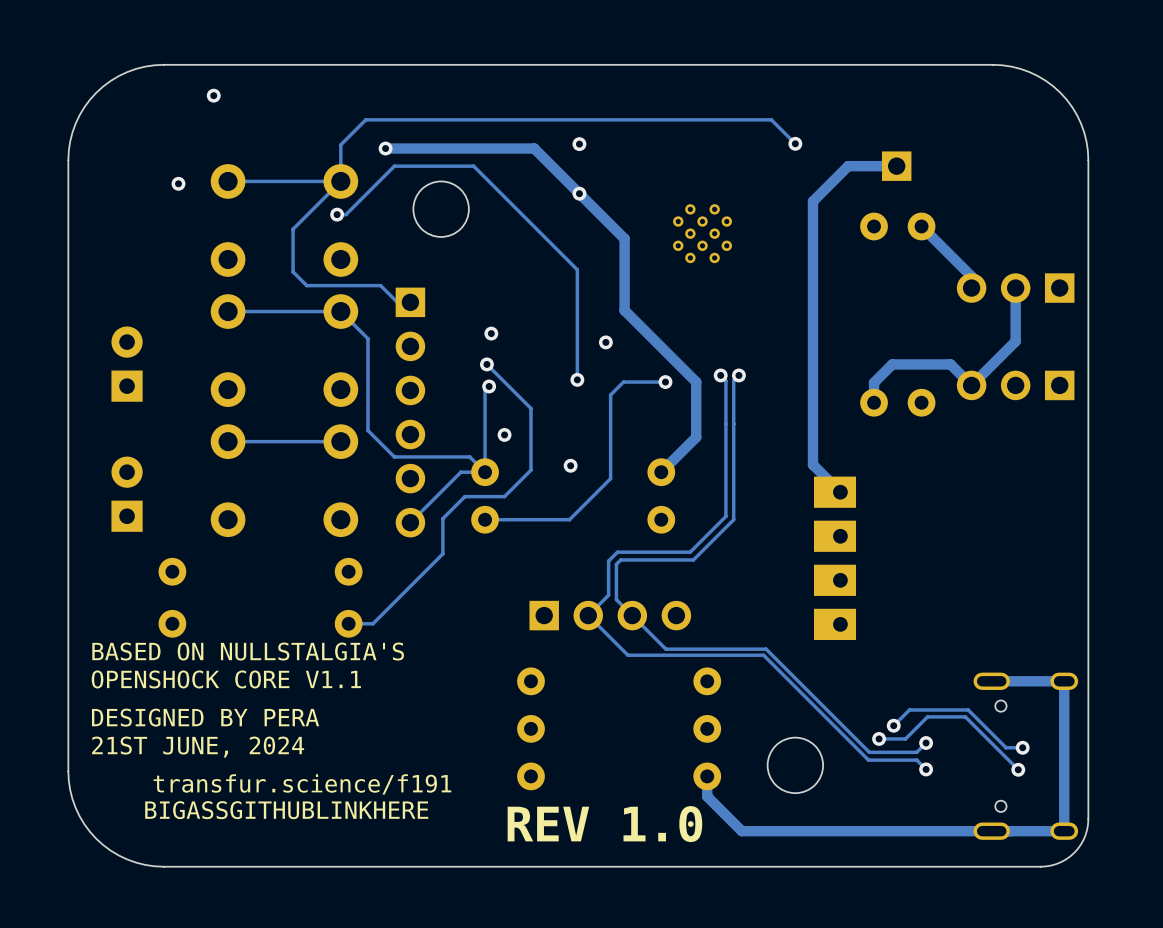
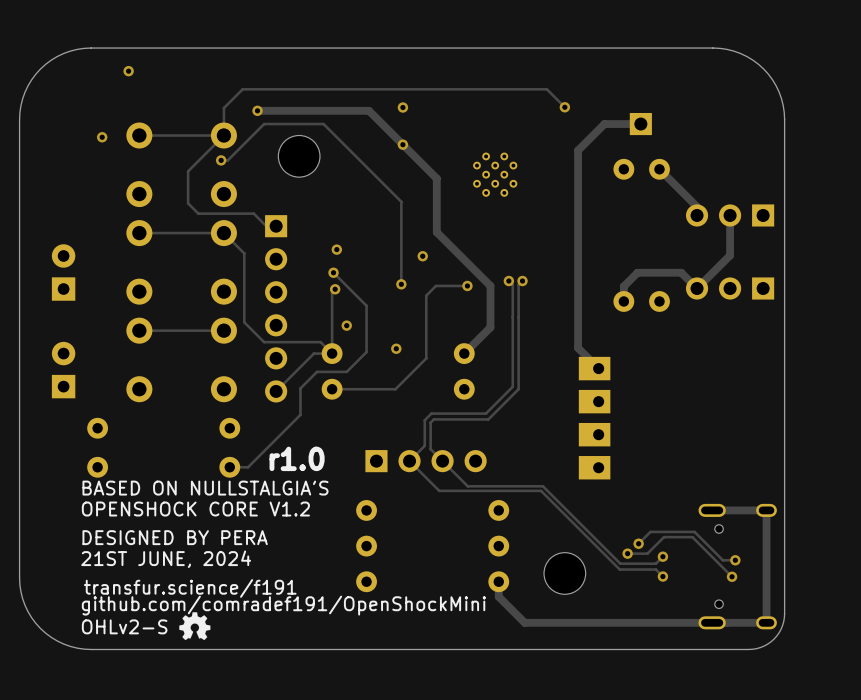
text: none -> r1.0 (297, 458)
text position: BASED ON NULLSTALGIA'S (248, 651) -> BASED ON NULLSTALGIA'S (205, 488)
text: OPENSHOCK CORE V1.1 (226, 679) -> OPENSHOCK CORE V1.2 (195, 509)
text position: DESIGNED BY PERA (205, 717) -> DESIGNED BY PERA (175, 537)
text position: 21ST JUNE, 2024 (198, 747) -> 21ST JUNE, 2024 (166, 559)
text: BIGASSGITHUBLINKHERE (286, 810) -> github.com/comradef191/OpenShockMini (283, 605)
drawing: none -> [179, 612, 211, 641]
text: REV 1.0 (604, 824) -> none
text: none -> OHLv2-S (124, 626)

